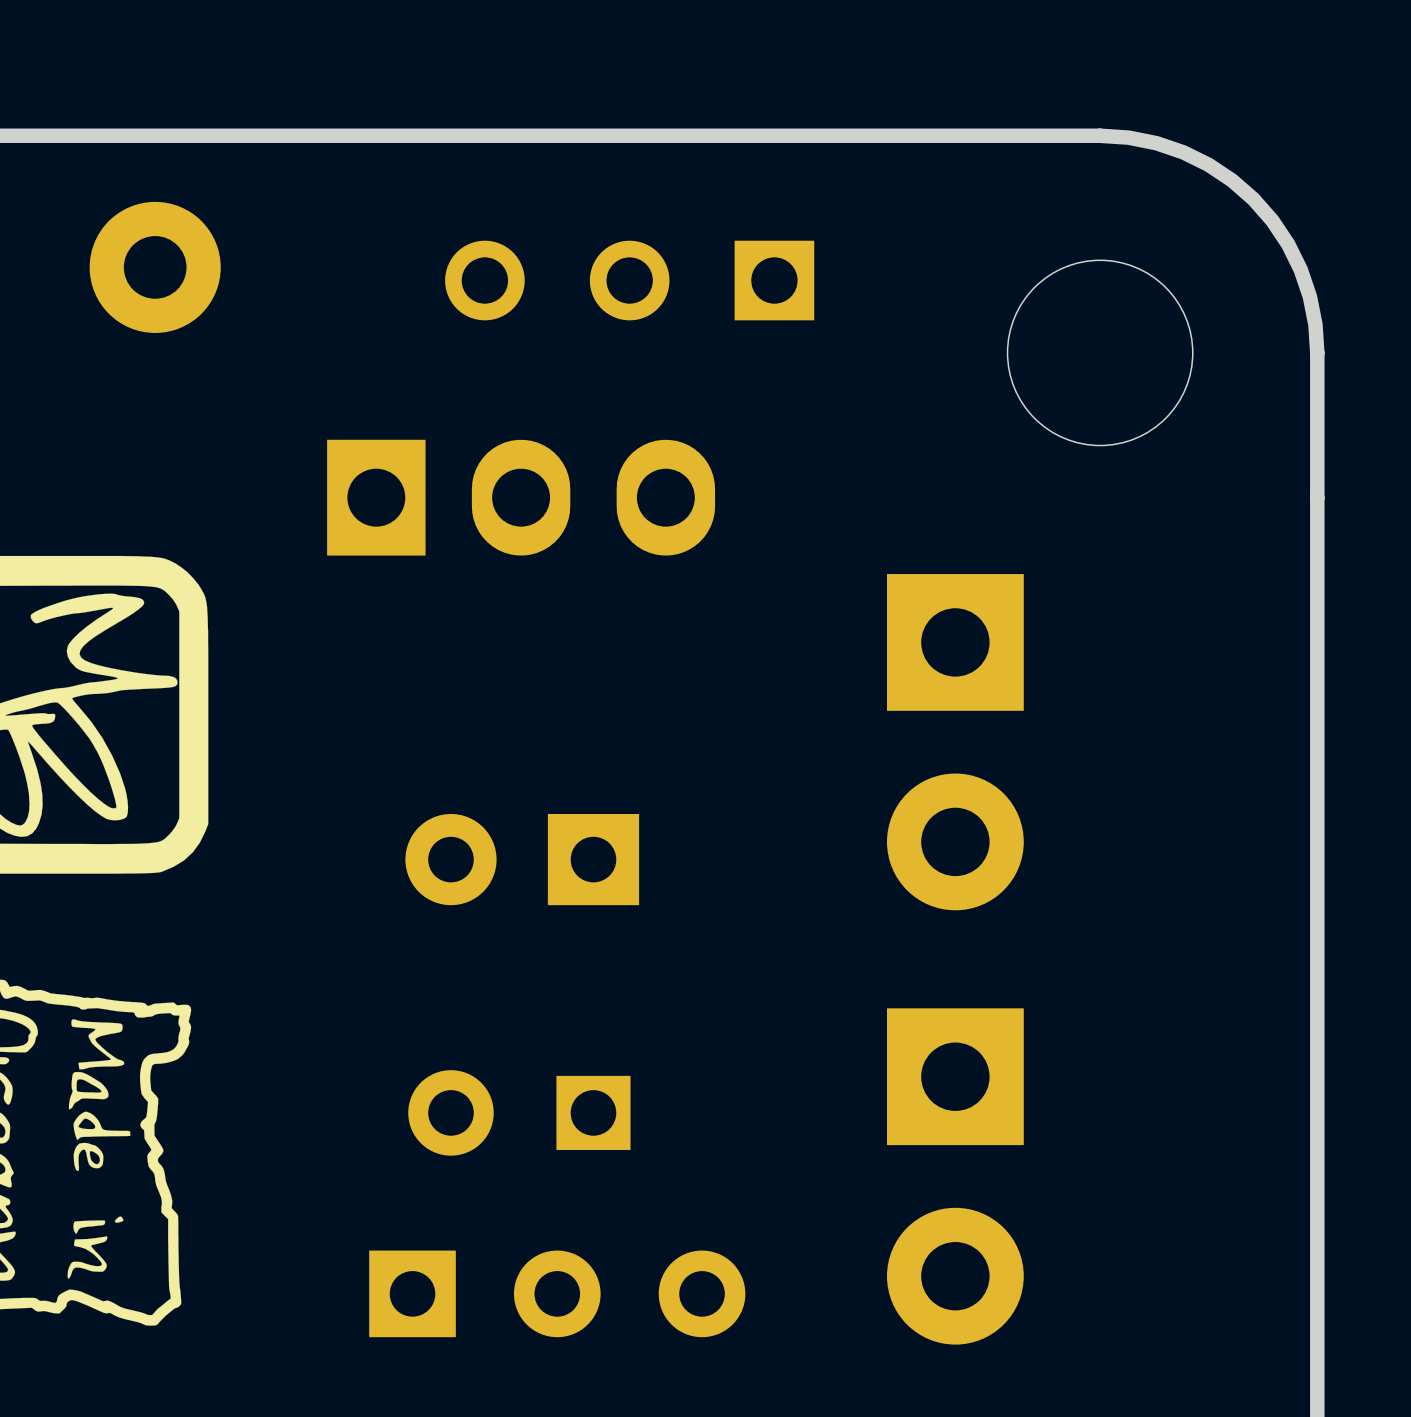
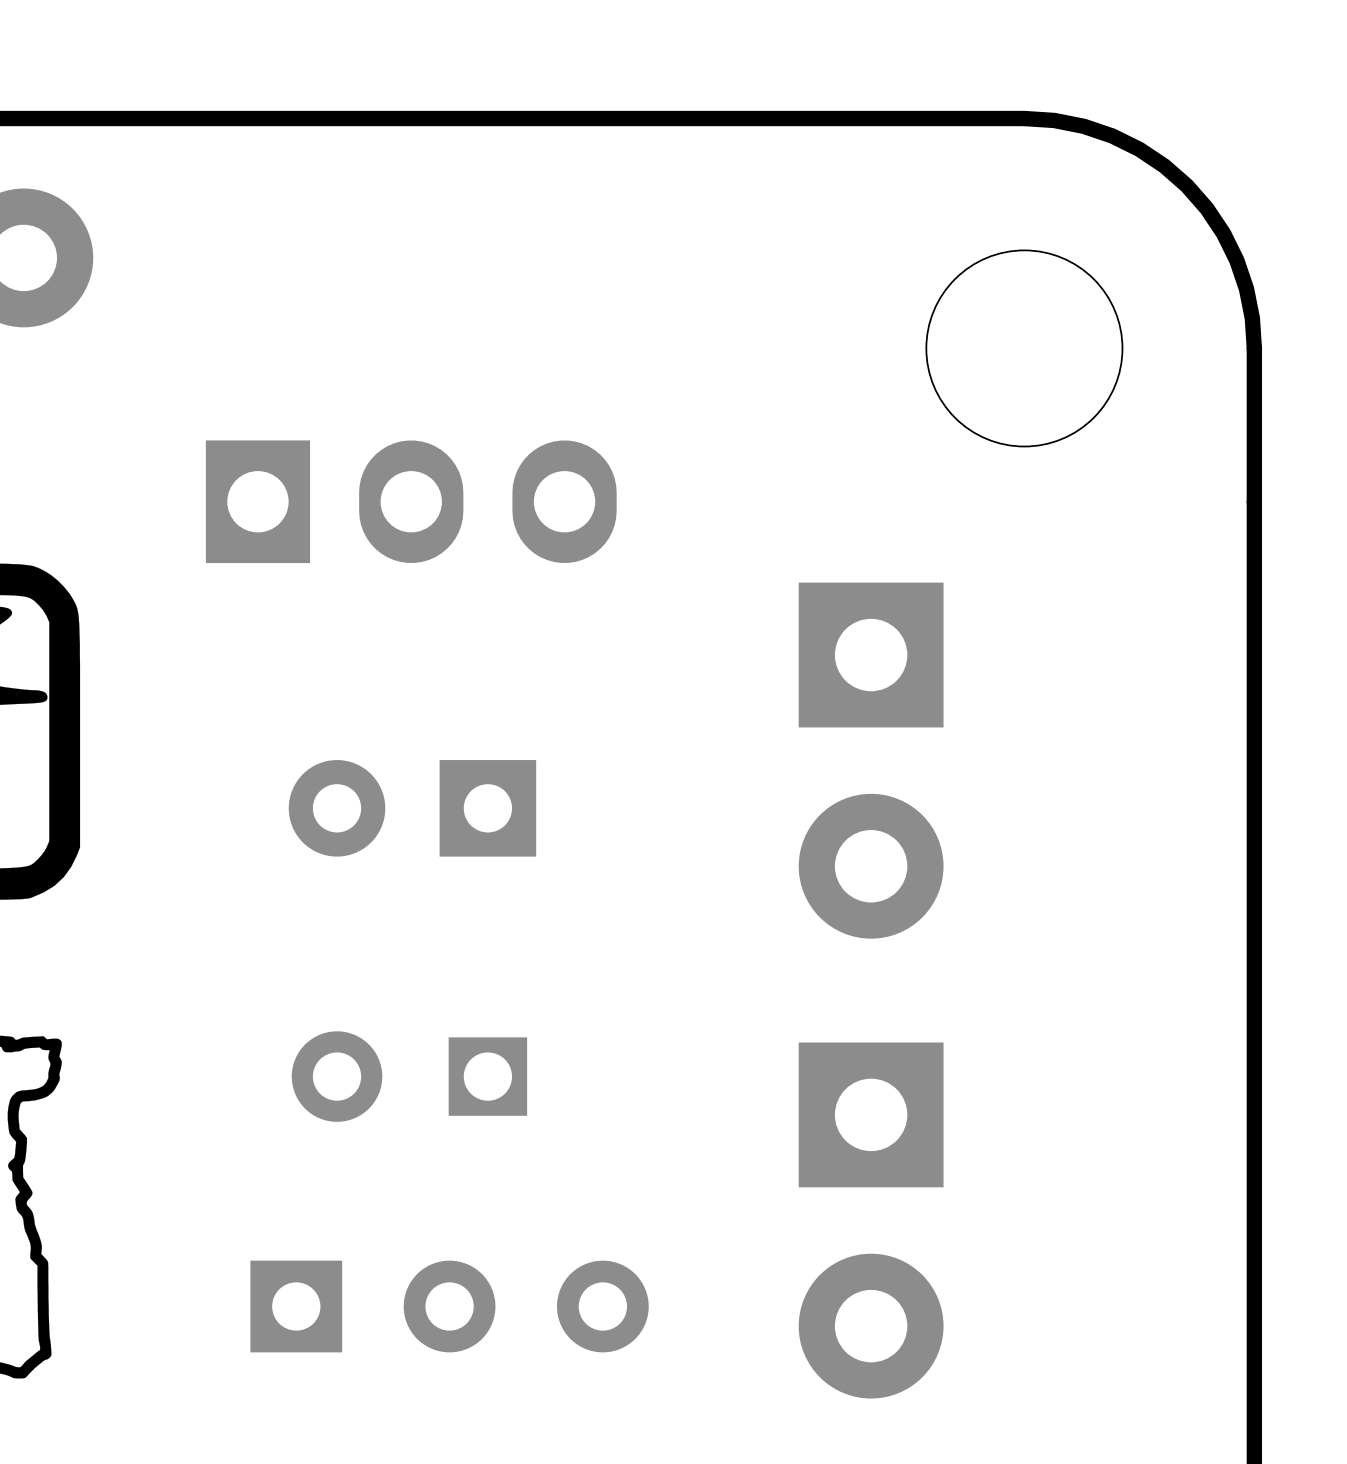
part: (629, 280) -> none
part position: (522, 859) -> (412, 808)
part position: (519, 1112) -> (409, 1076)
part position: (557, 1293) -> (449, 1306)

